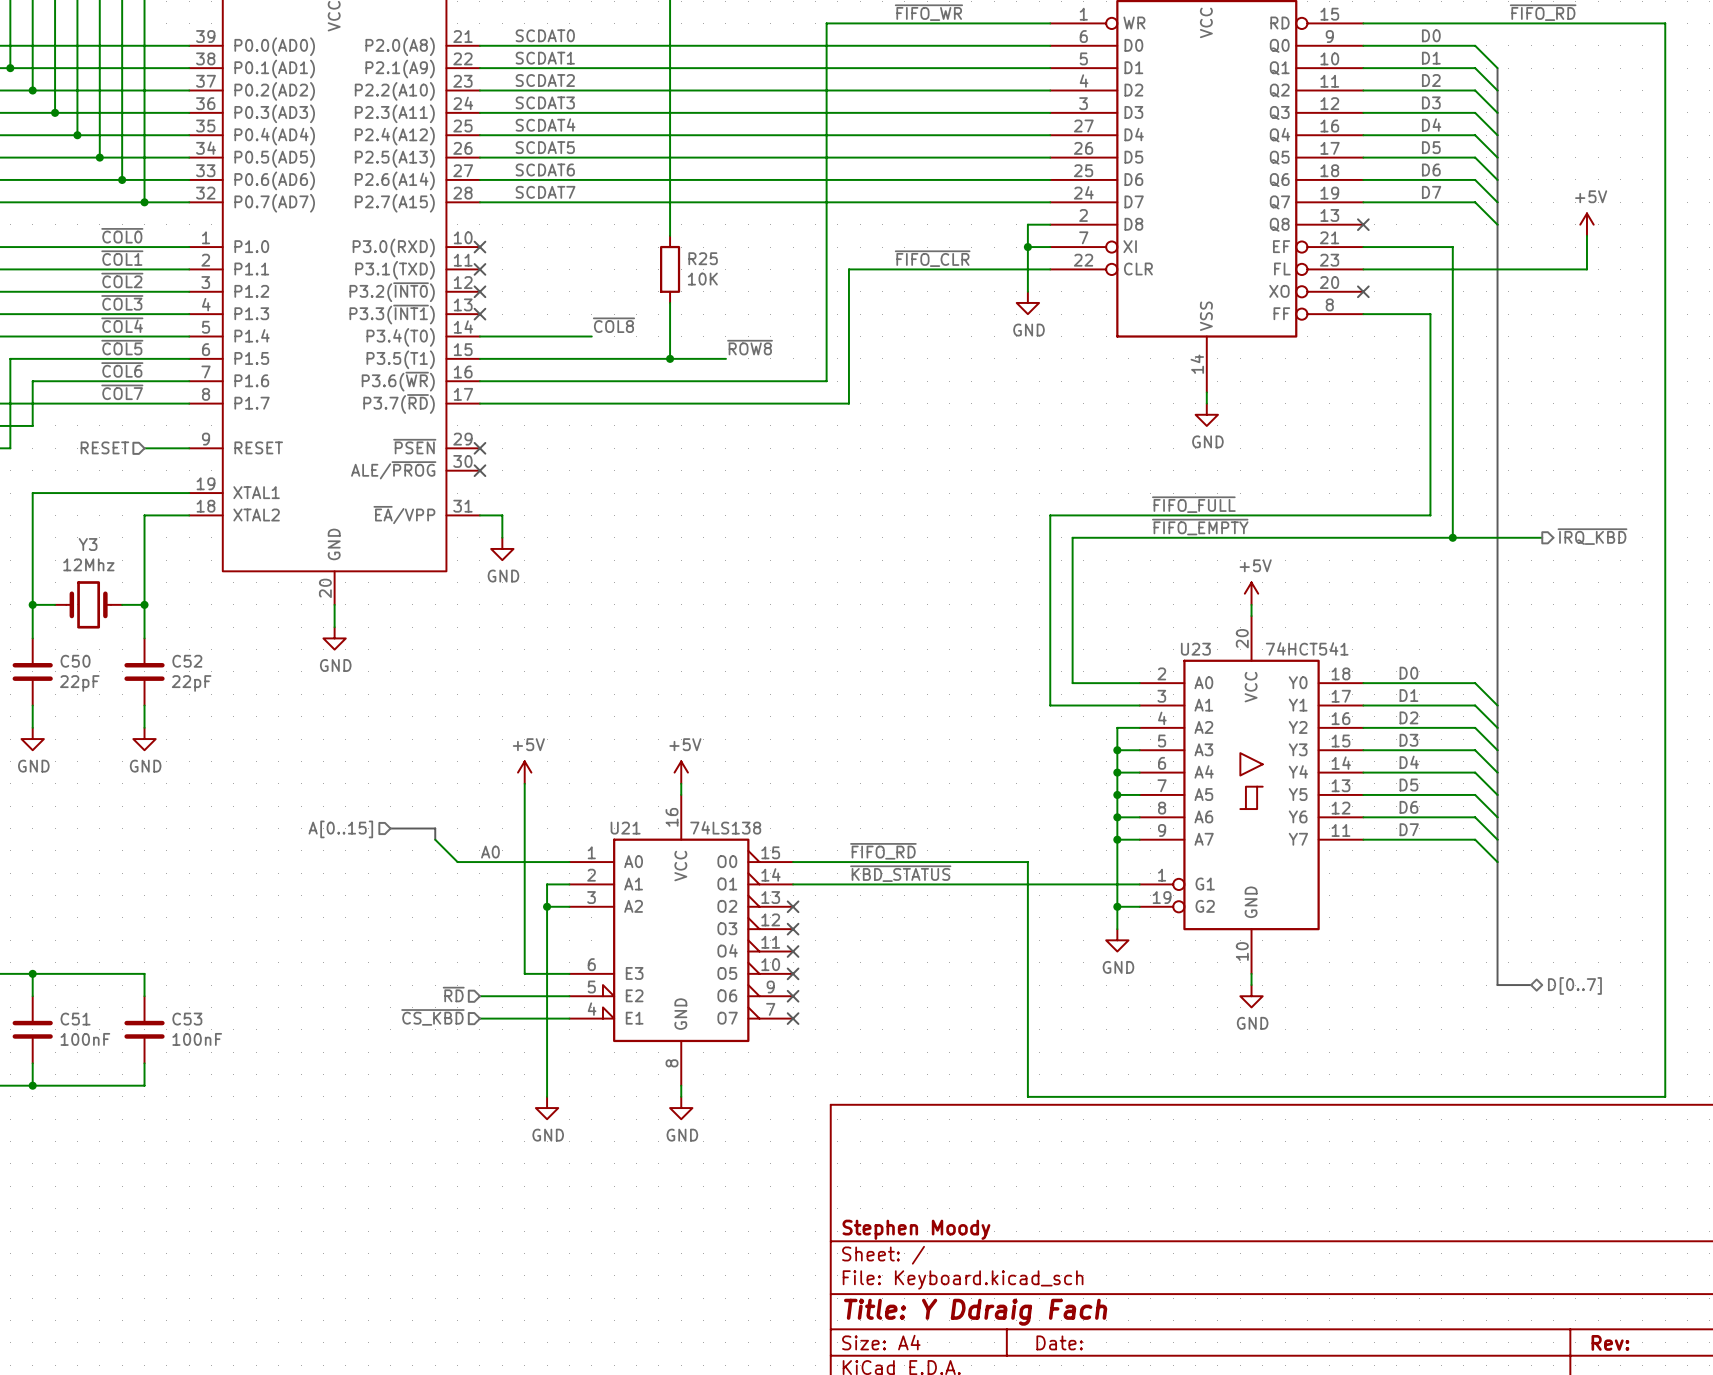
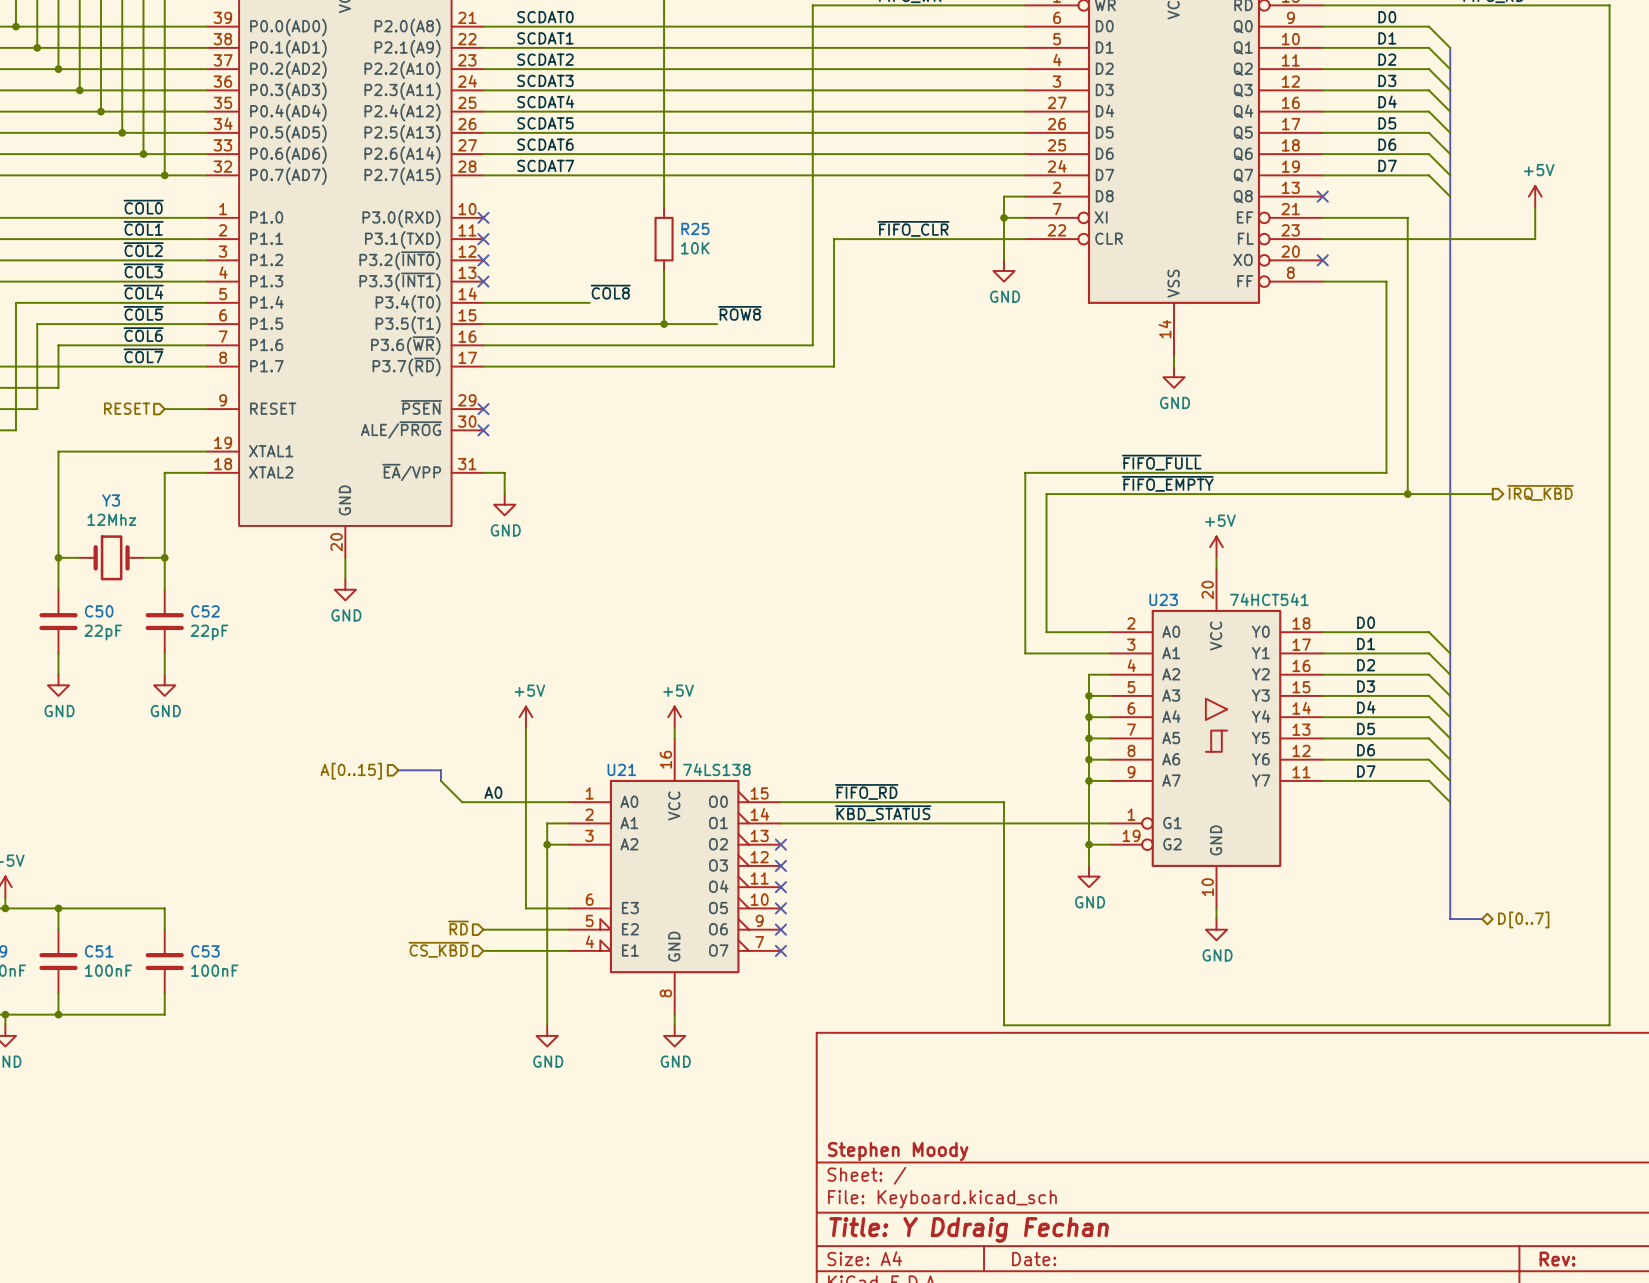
title block: Title: Y Ddraig Fach (975, 1312) -> Title: Y Ddraig Fechan (969, 1229)

